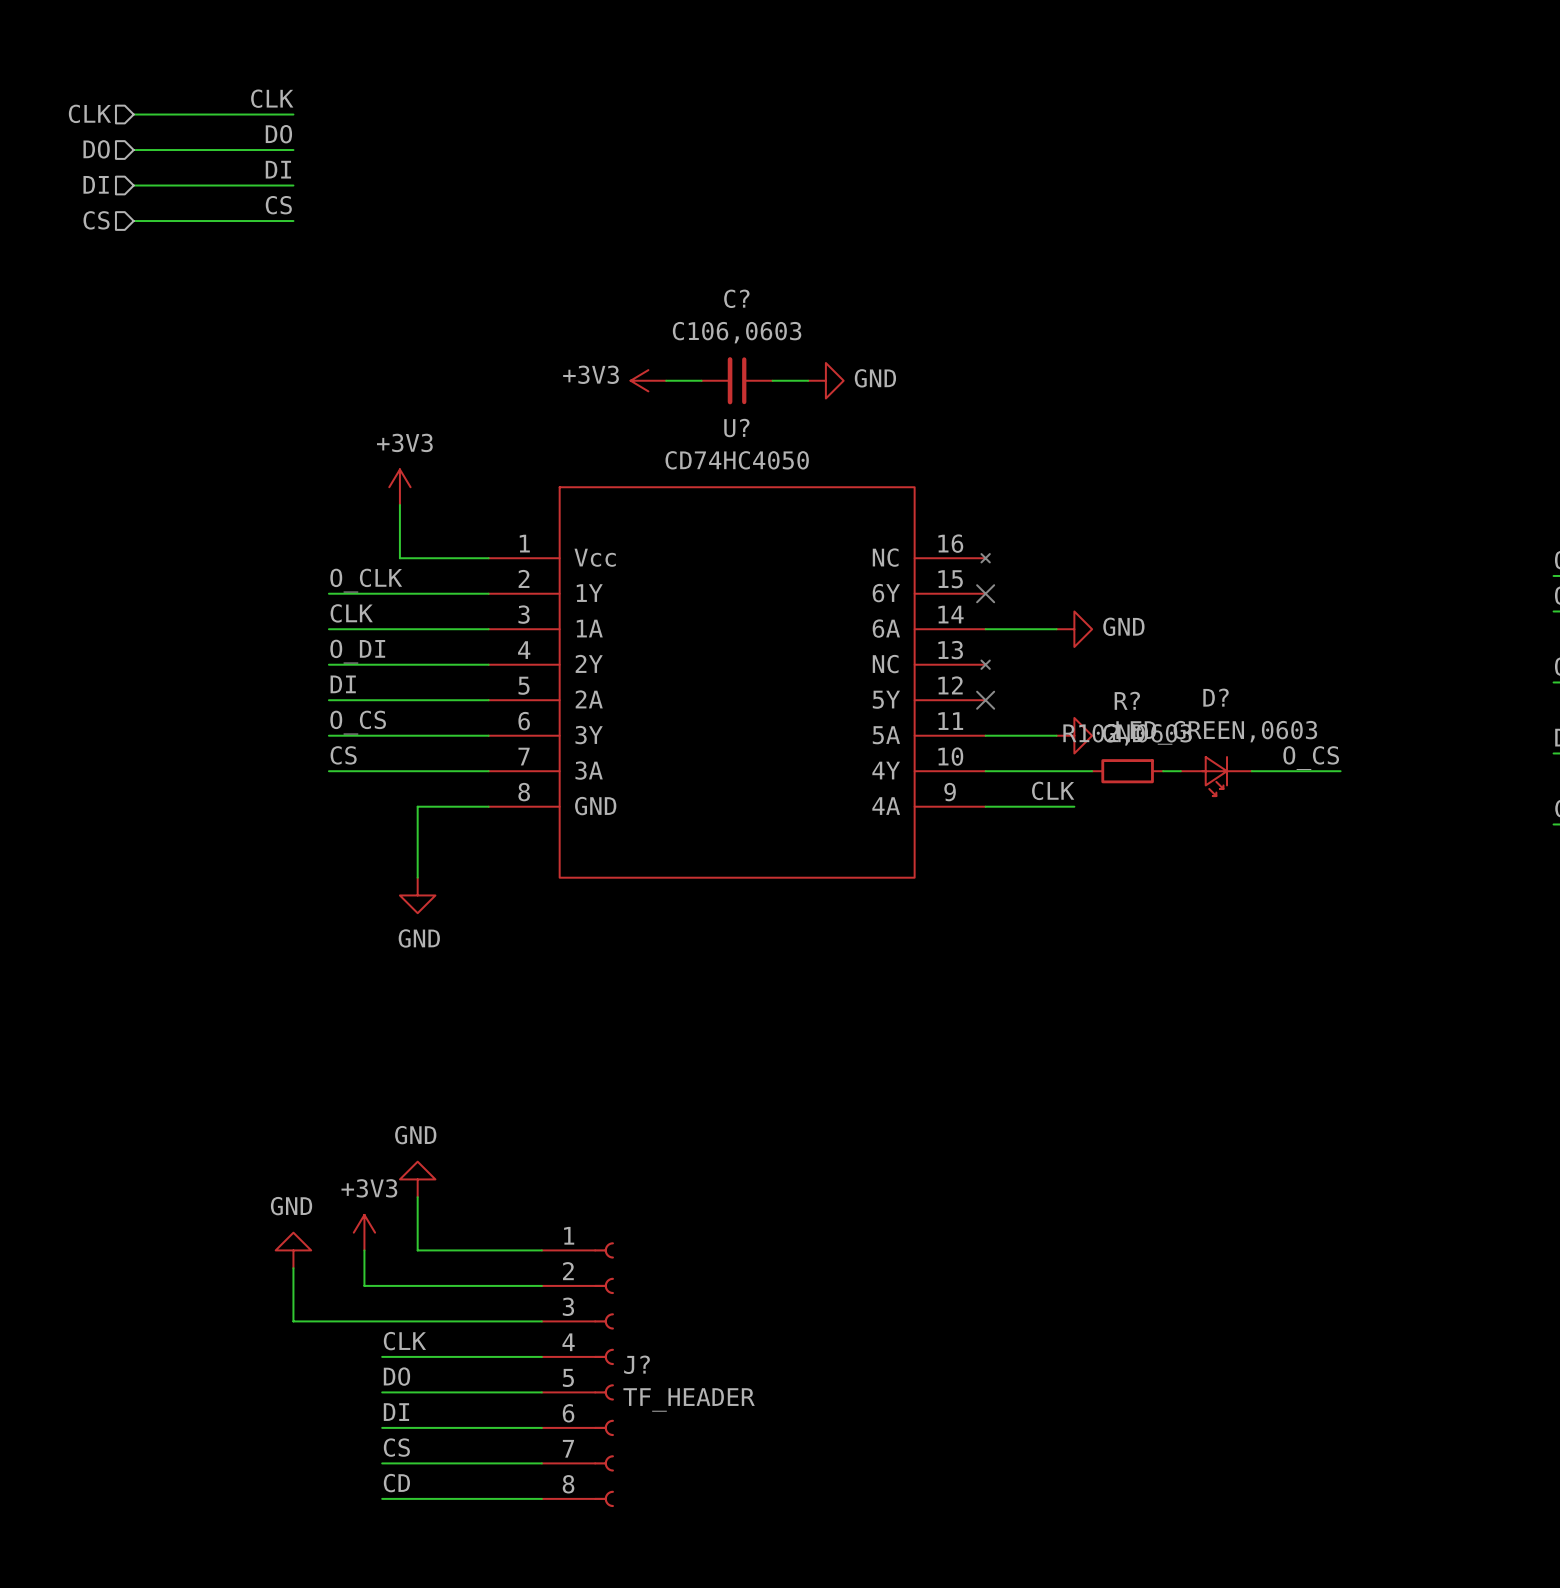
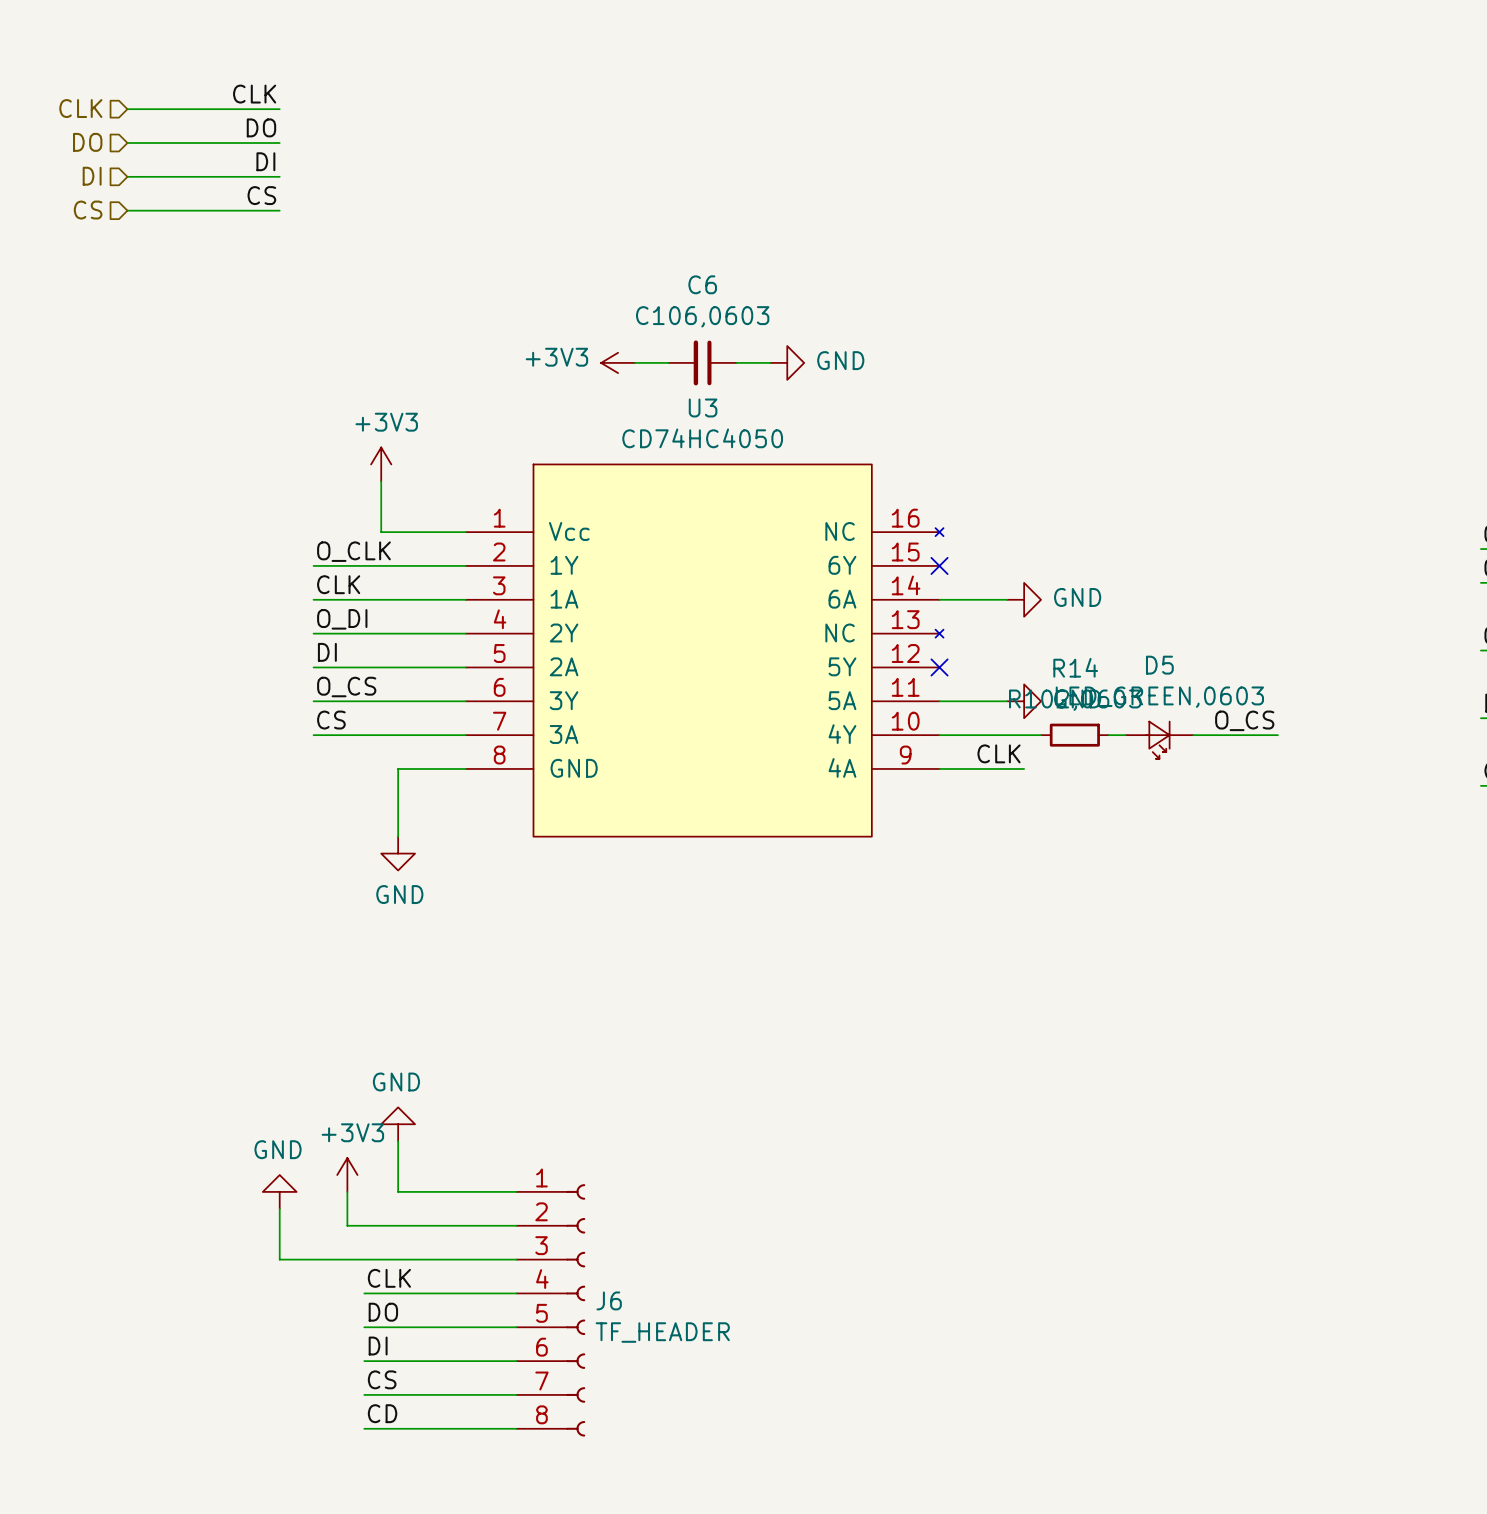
C? name: C? (736, 298) -> C6 (702, 284)
U? name: U? (736, 428) -> U3 (703, 407)
D? name: D? (1216, 697) -> D5 (1159, 665)
R? name: R? (1127, 700) -> R14 (1075, 667)
J? name: J? (637, 1364) -> J6 (609, 1300)

